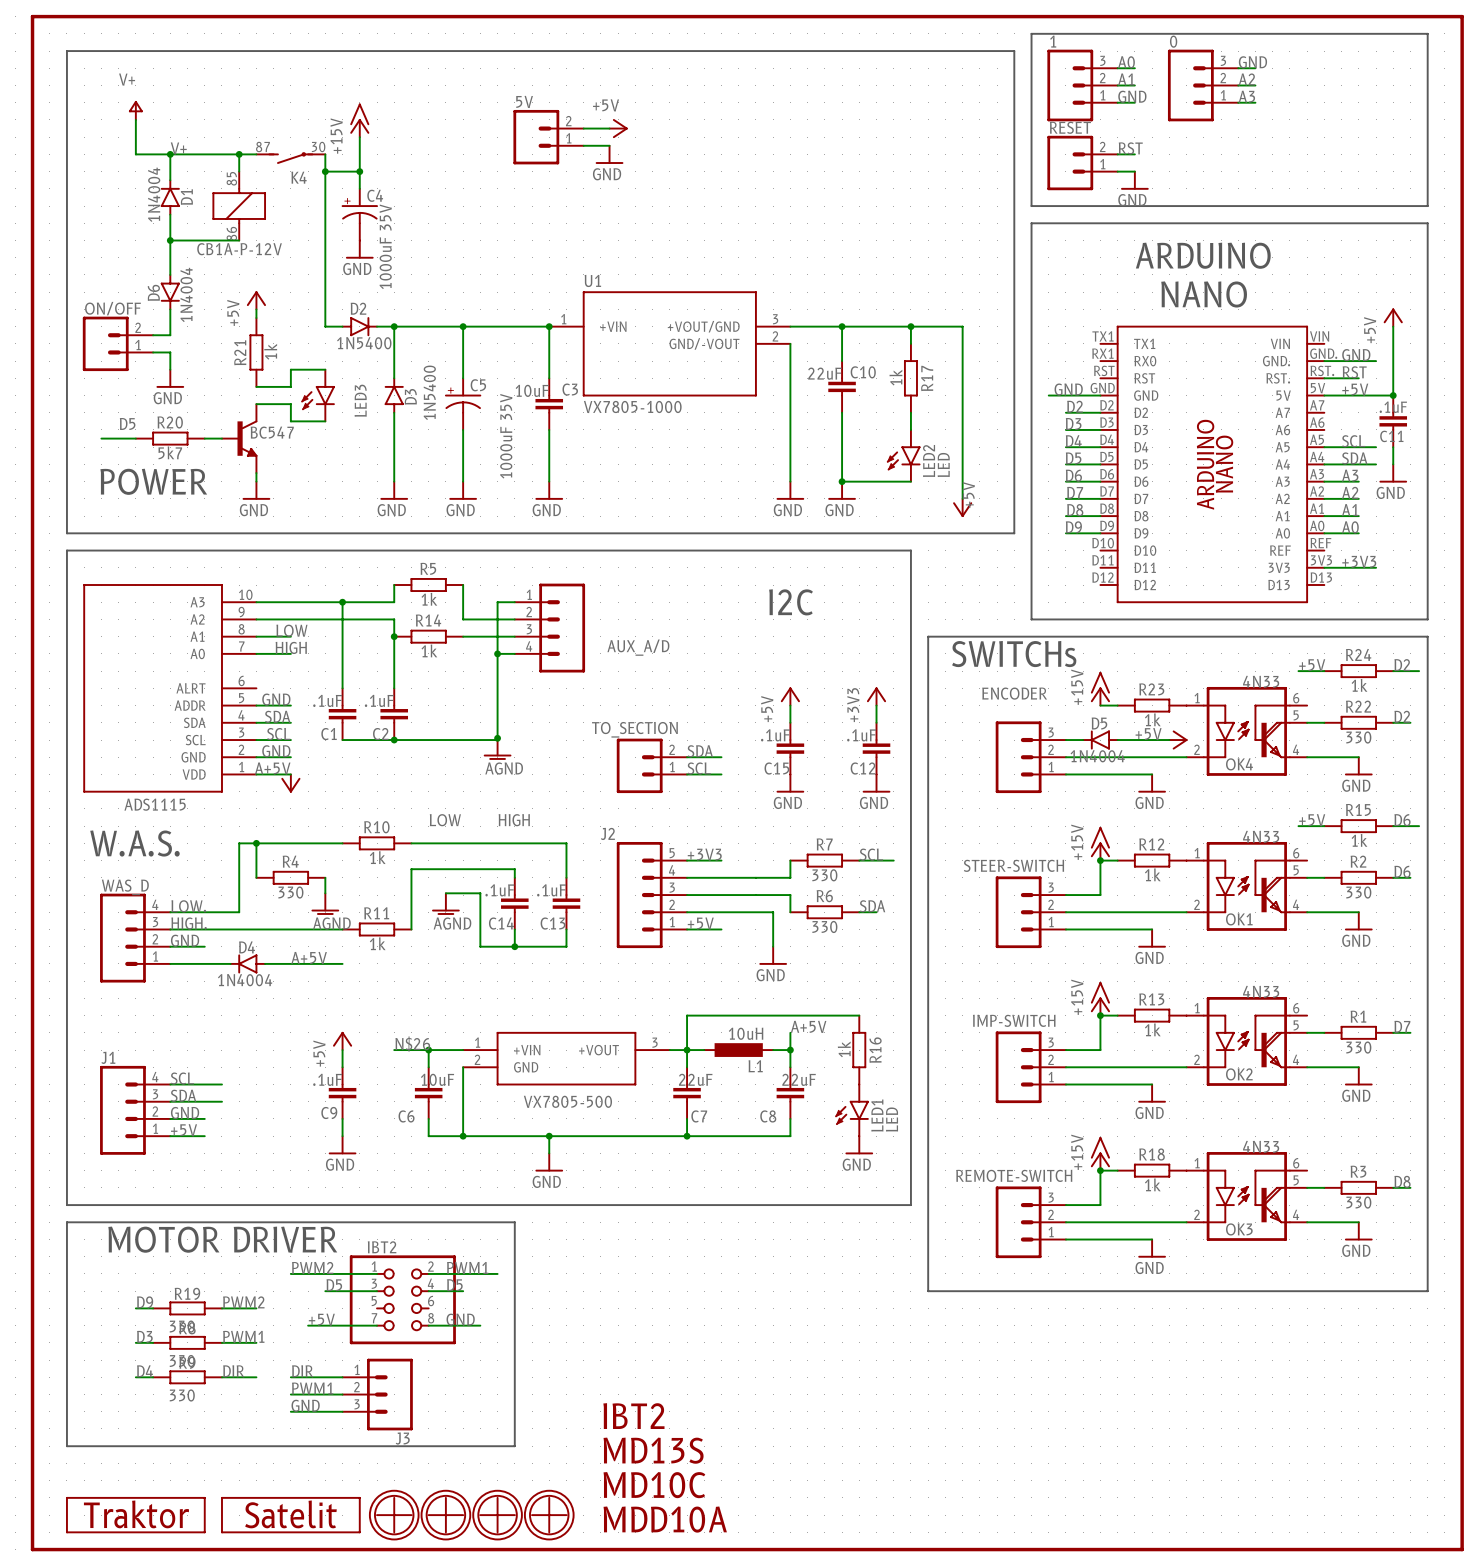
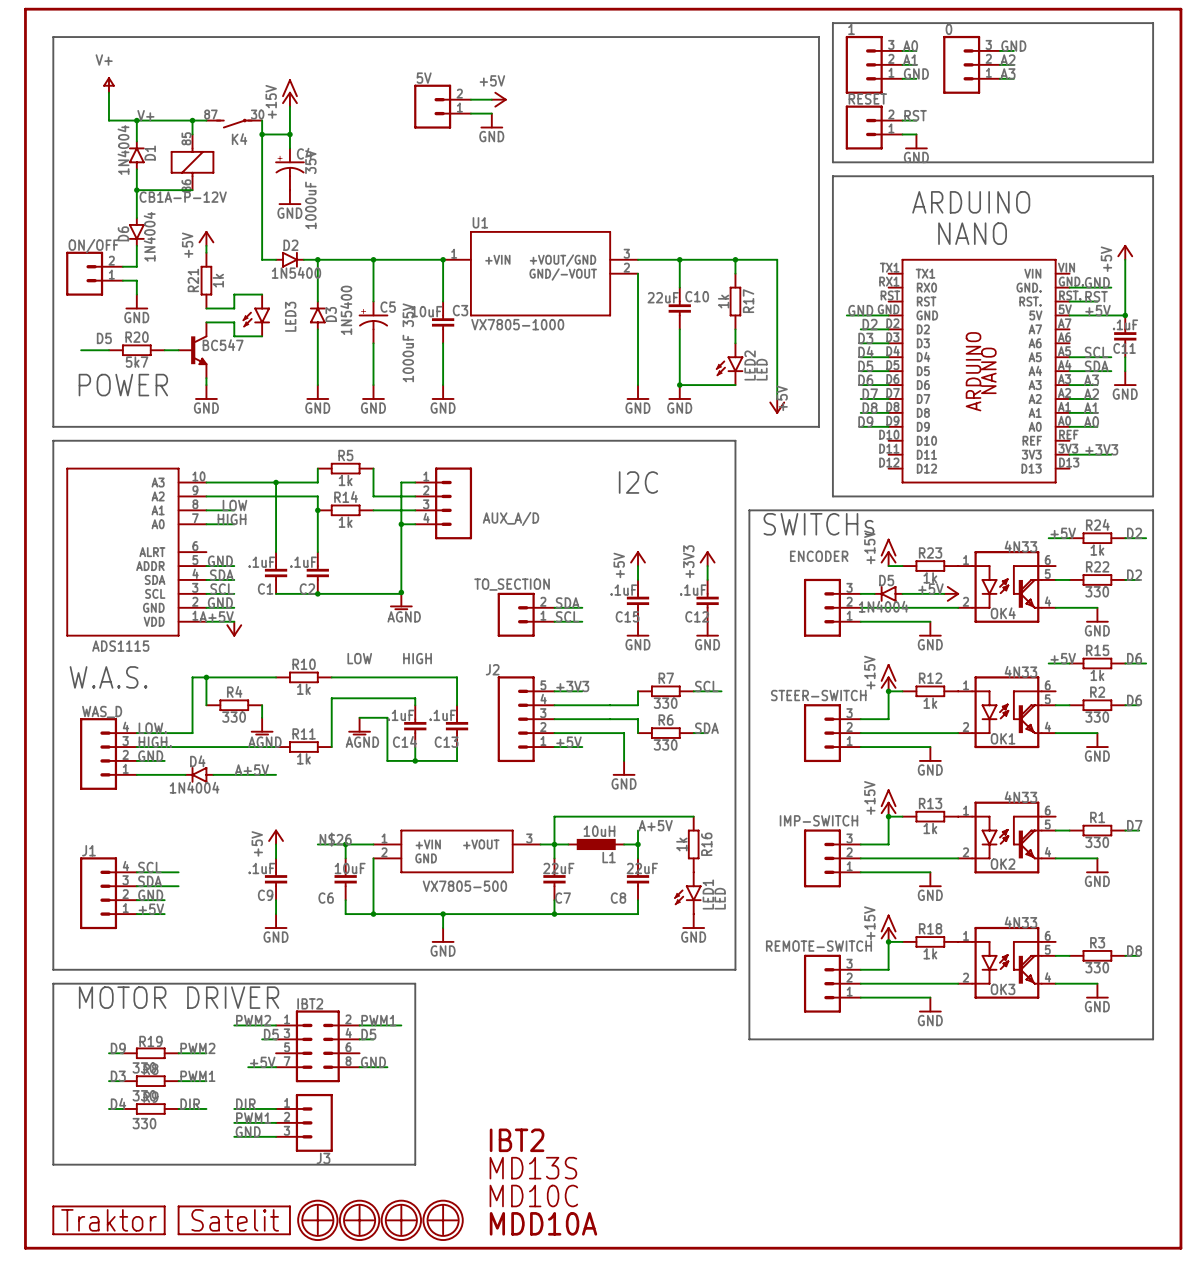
IBT2 symbol: [349, 1255, 456, 1345] -> [276, 1010, 360, 1083]

